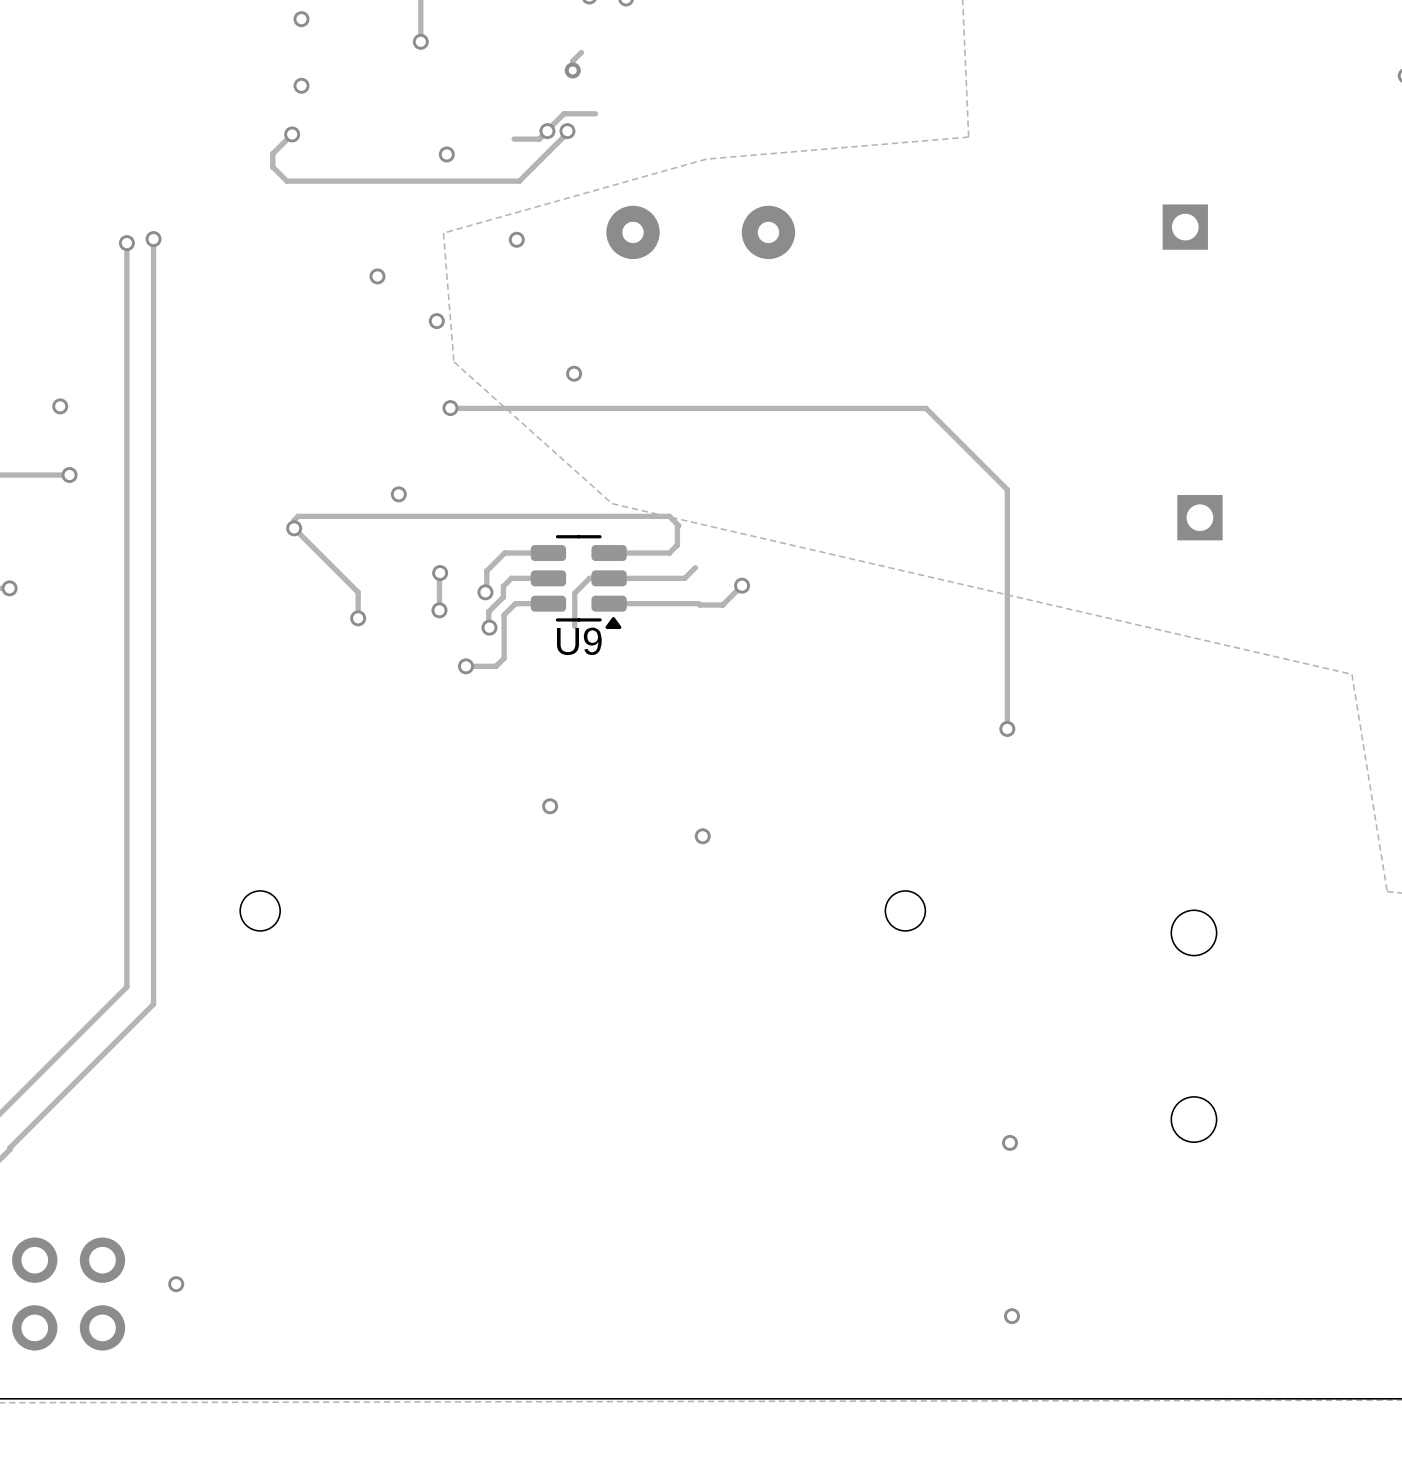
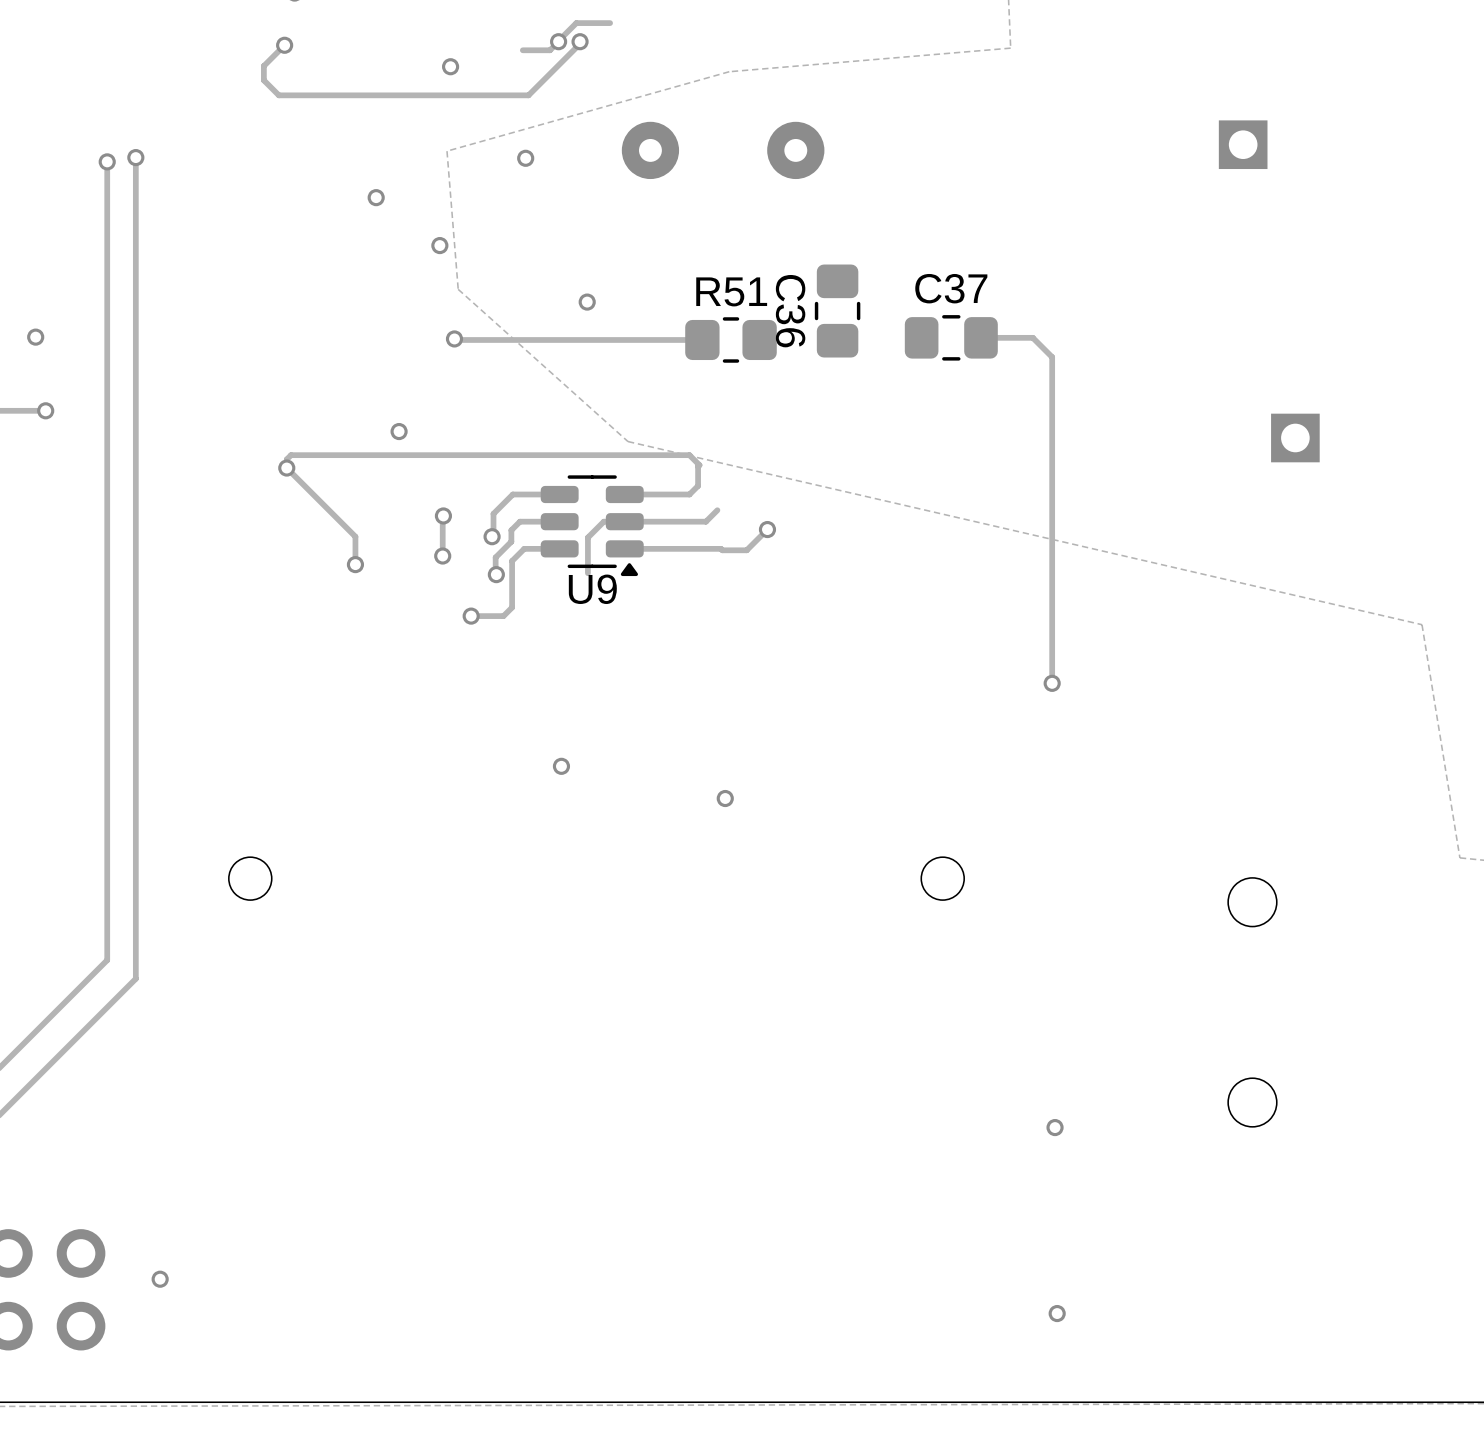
C36: none -> (837, 311)
C37: none -> (951, 337)
track: none -> (981, 337) (1032, 337) (1052, 357) (1052, 426)
track: (450, 408) (926, 408) (1007, 489) -> (454, 339) (702, 339)
R51: none -> (730, 339)
part position: (1199, 517) -> (1295, 437)

